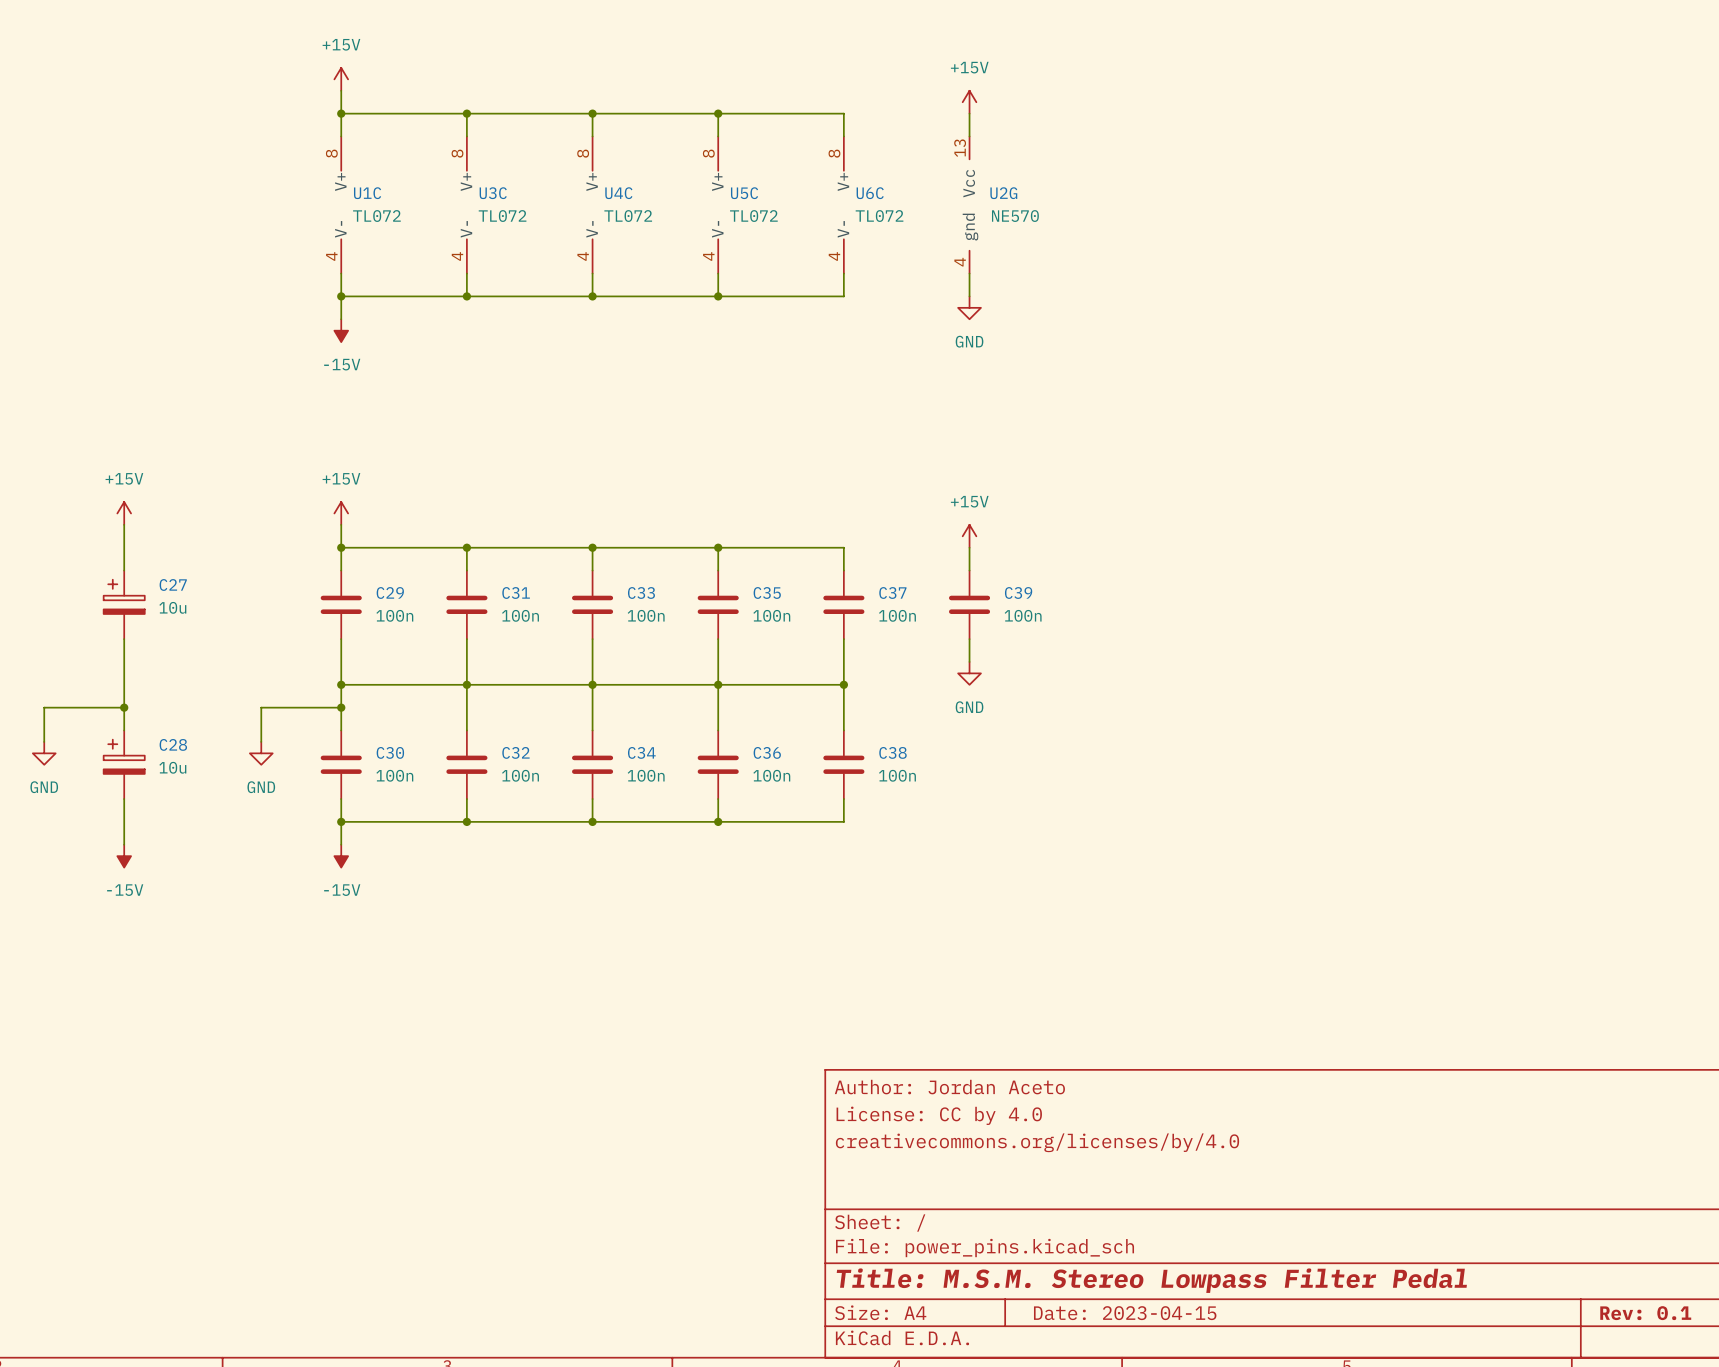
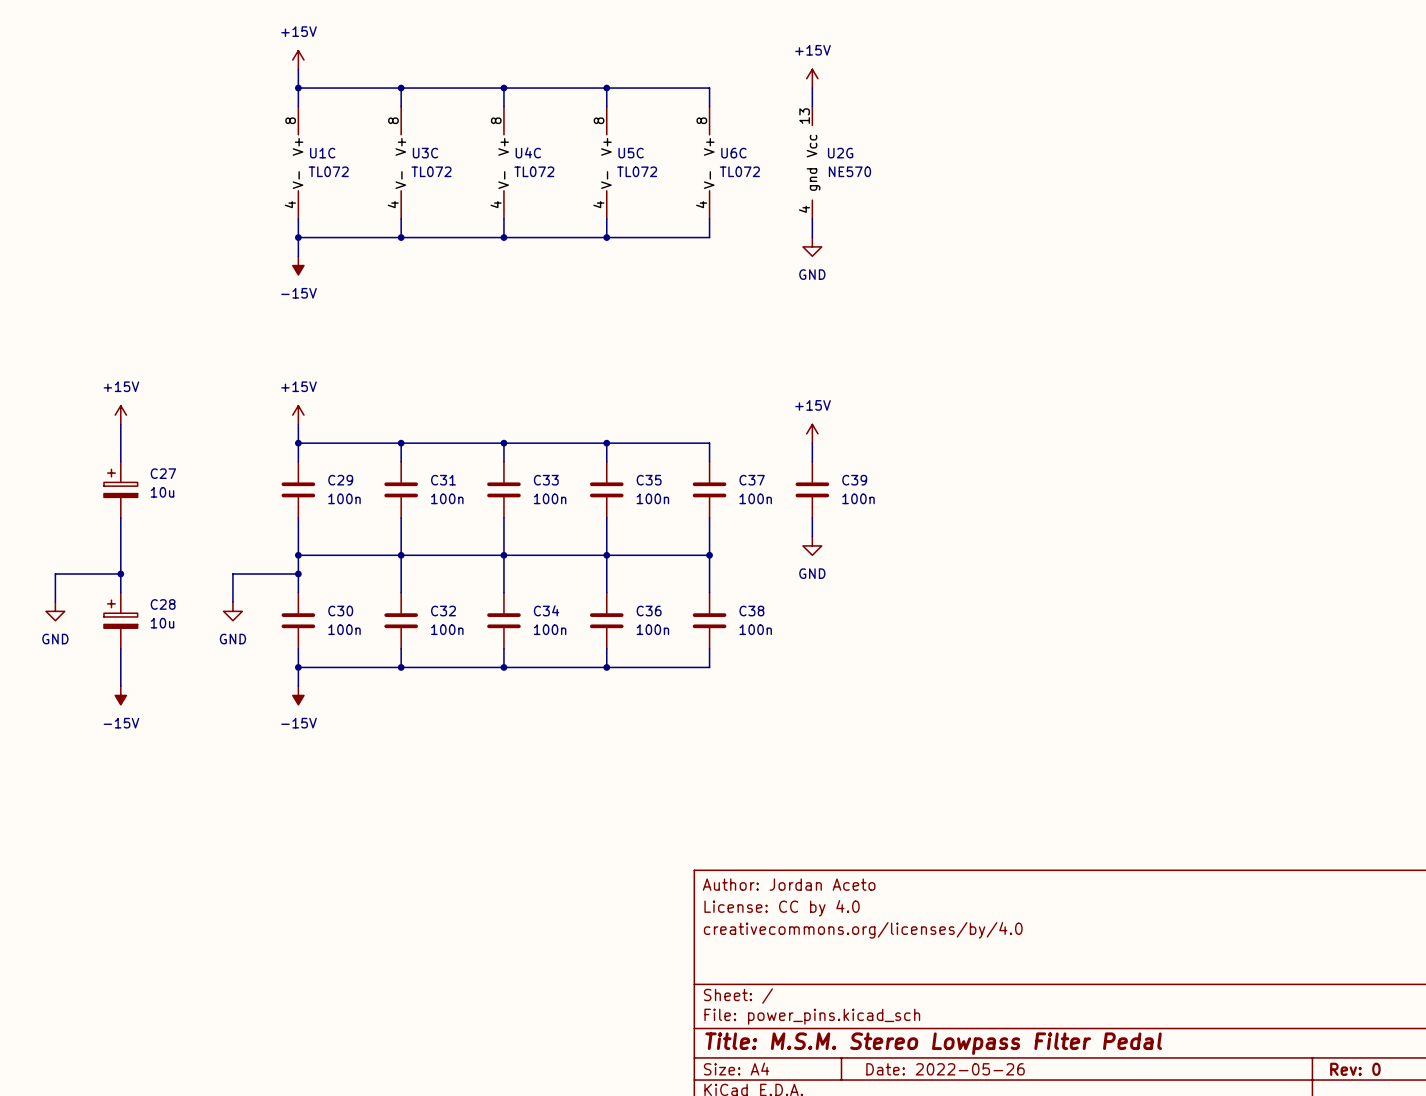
title block: Date: 2023-04-15 (1125, 1313) -> Date: 2022-05-26 (945, 1069)
title block: Rev: 0.1 (1645, 1313) -> Rev: 0 (1355, 1069)

